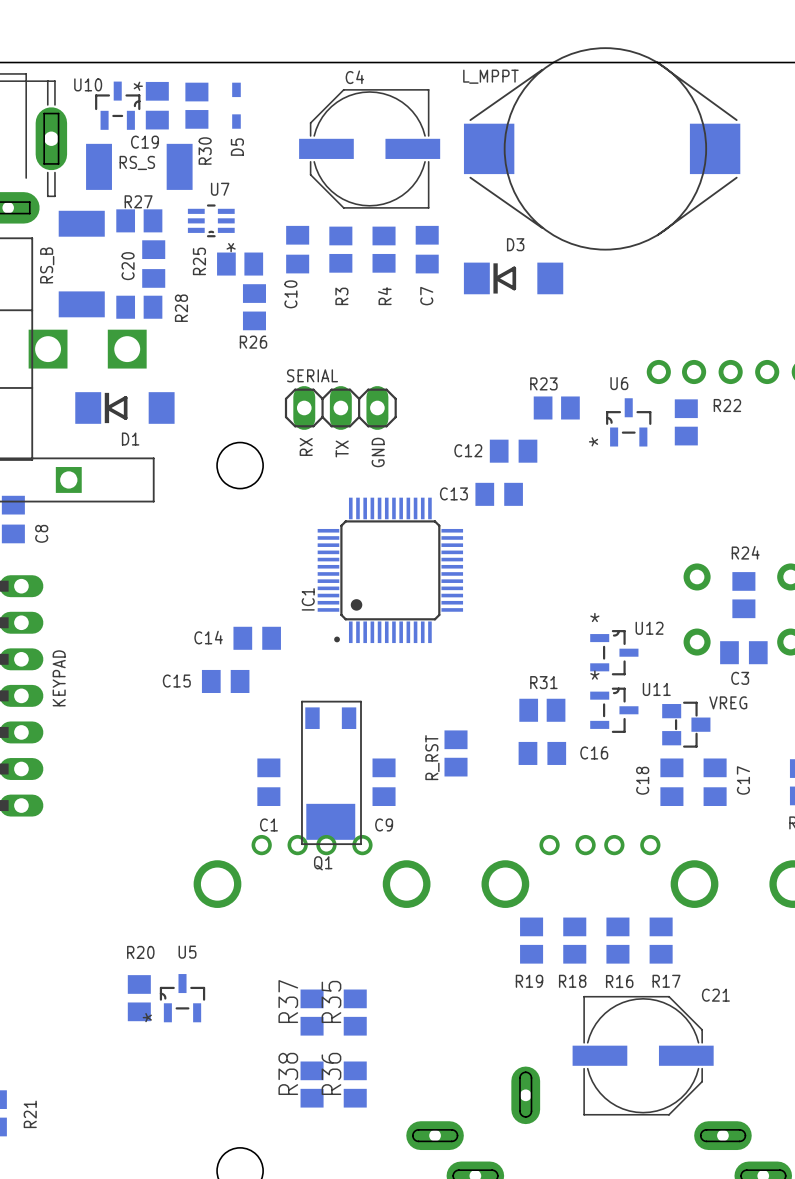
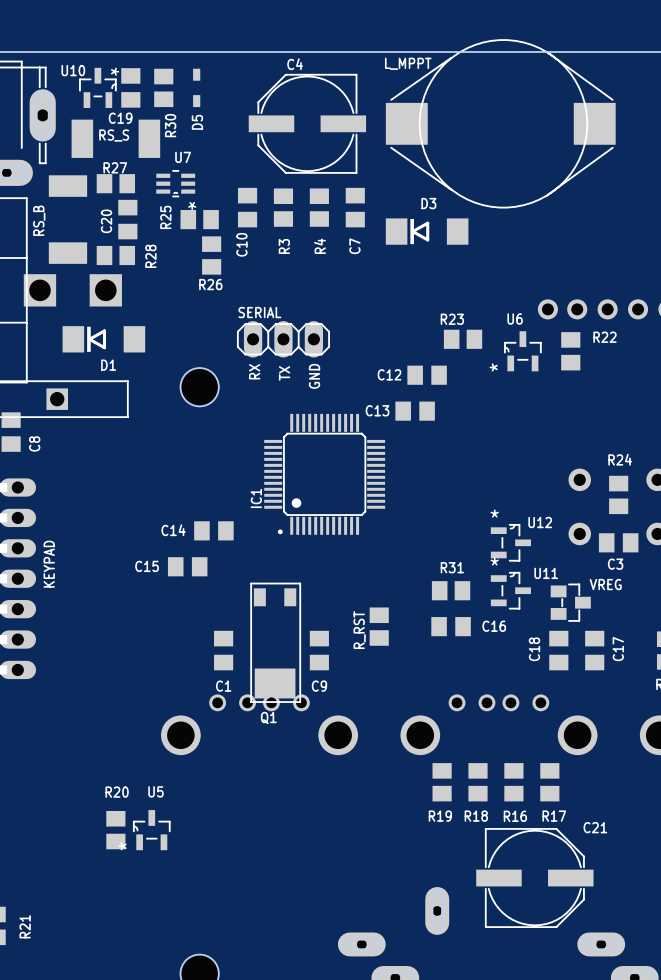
R37: (312, 1012) -> none
R35: (355, 1012) -> none
R38: (312, 1084) -> none
R36: (355, 1084) -> none

